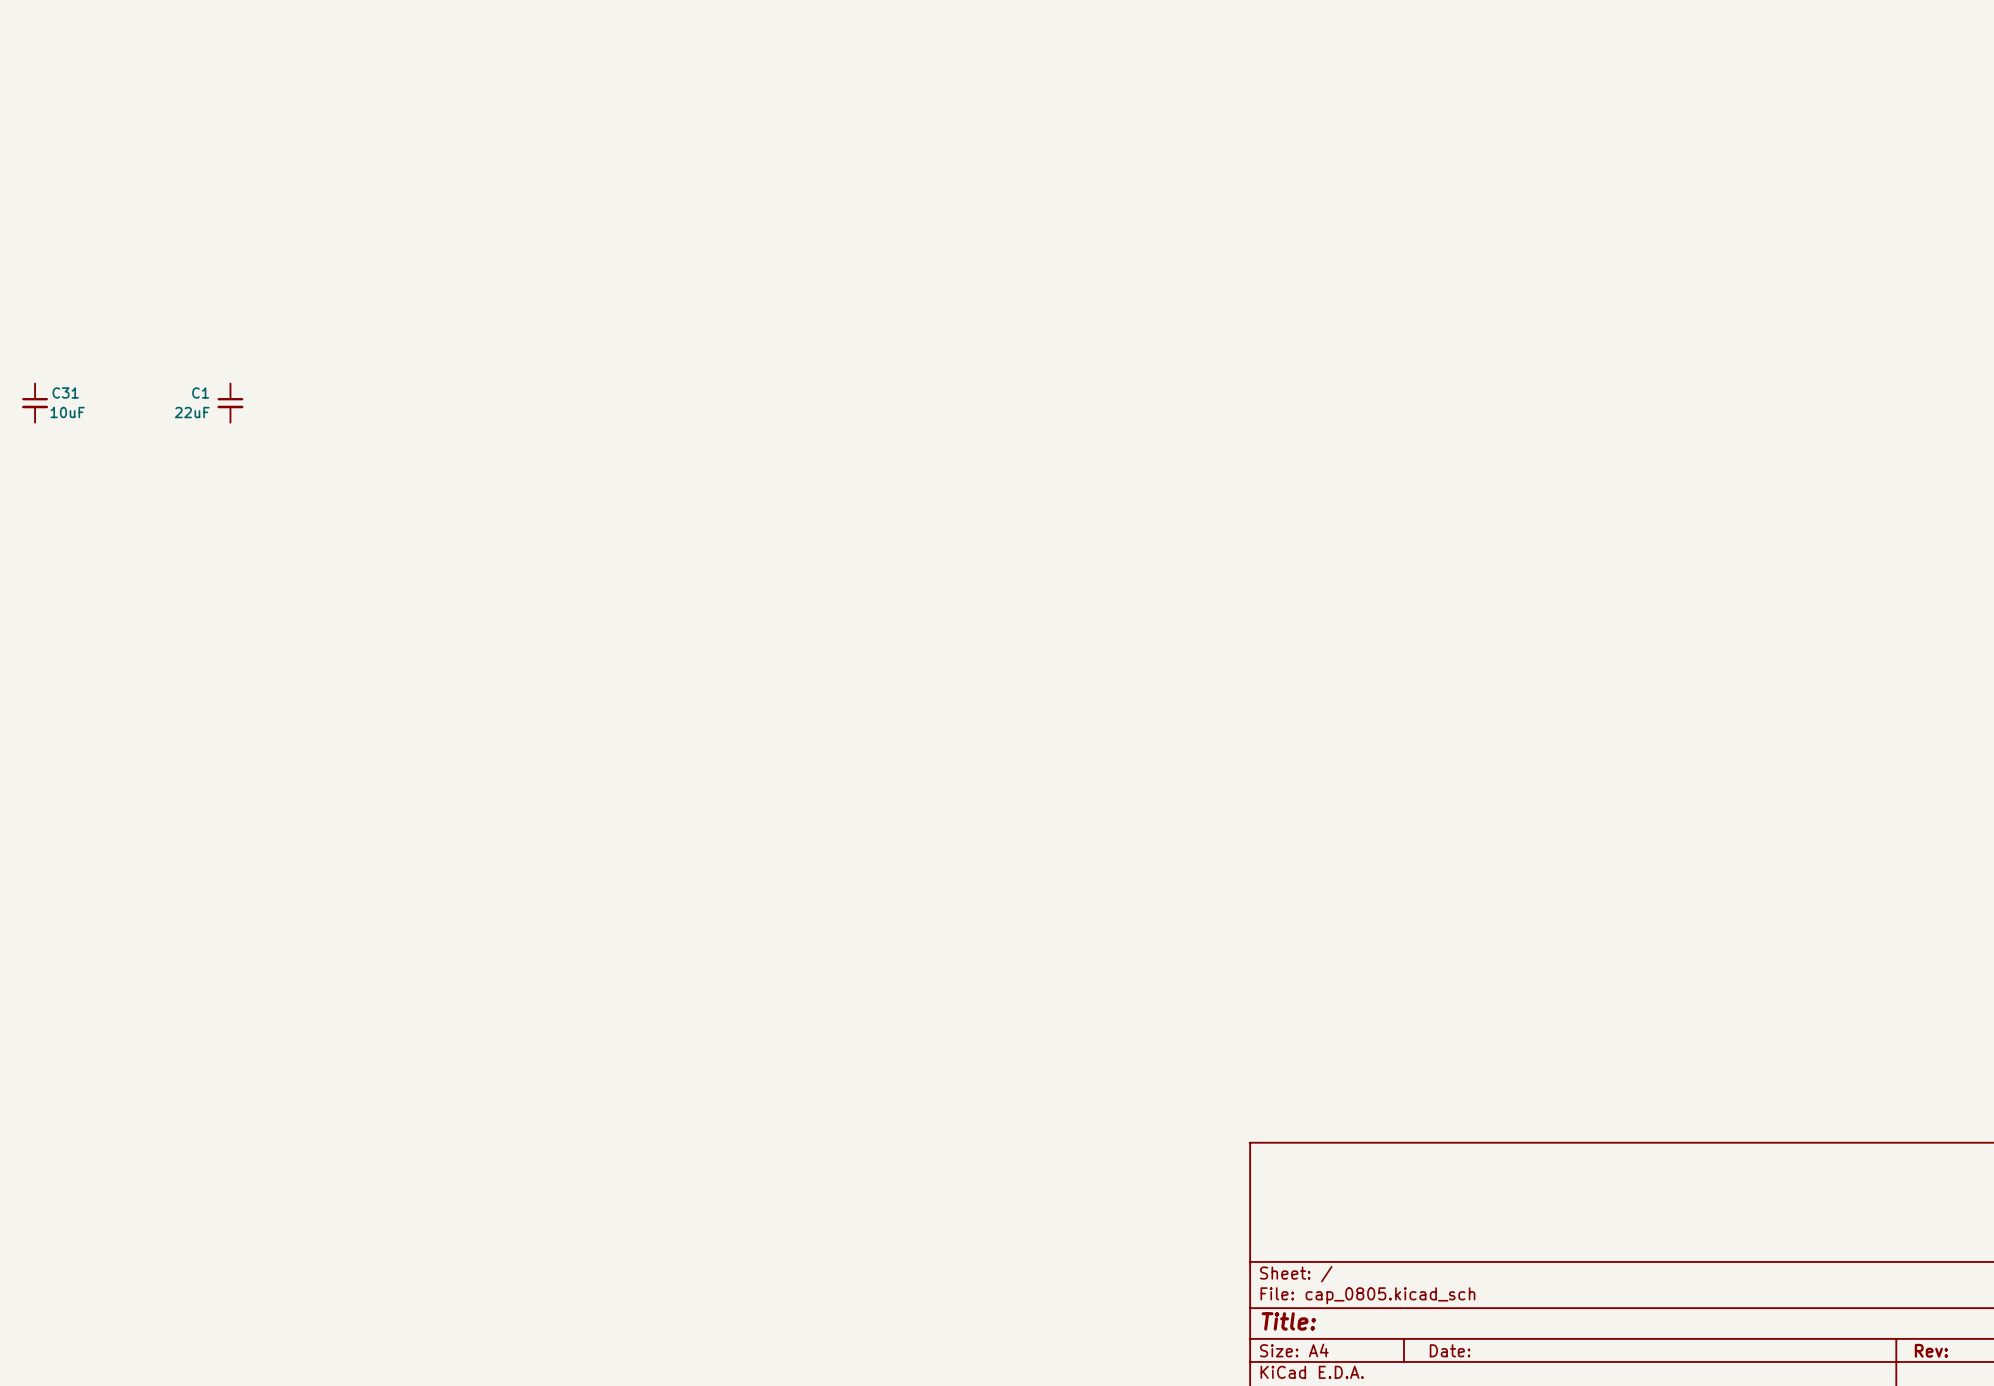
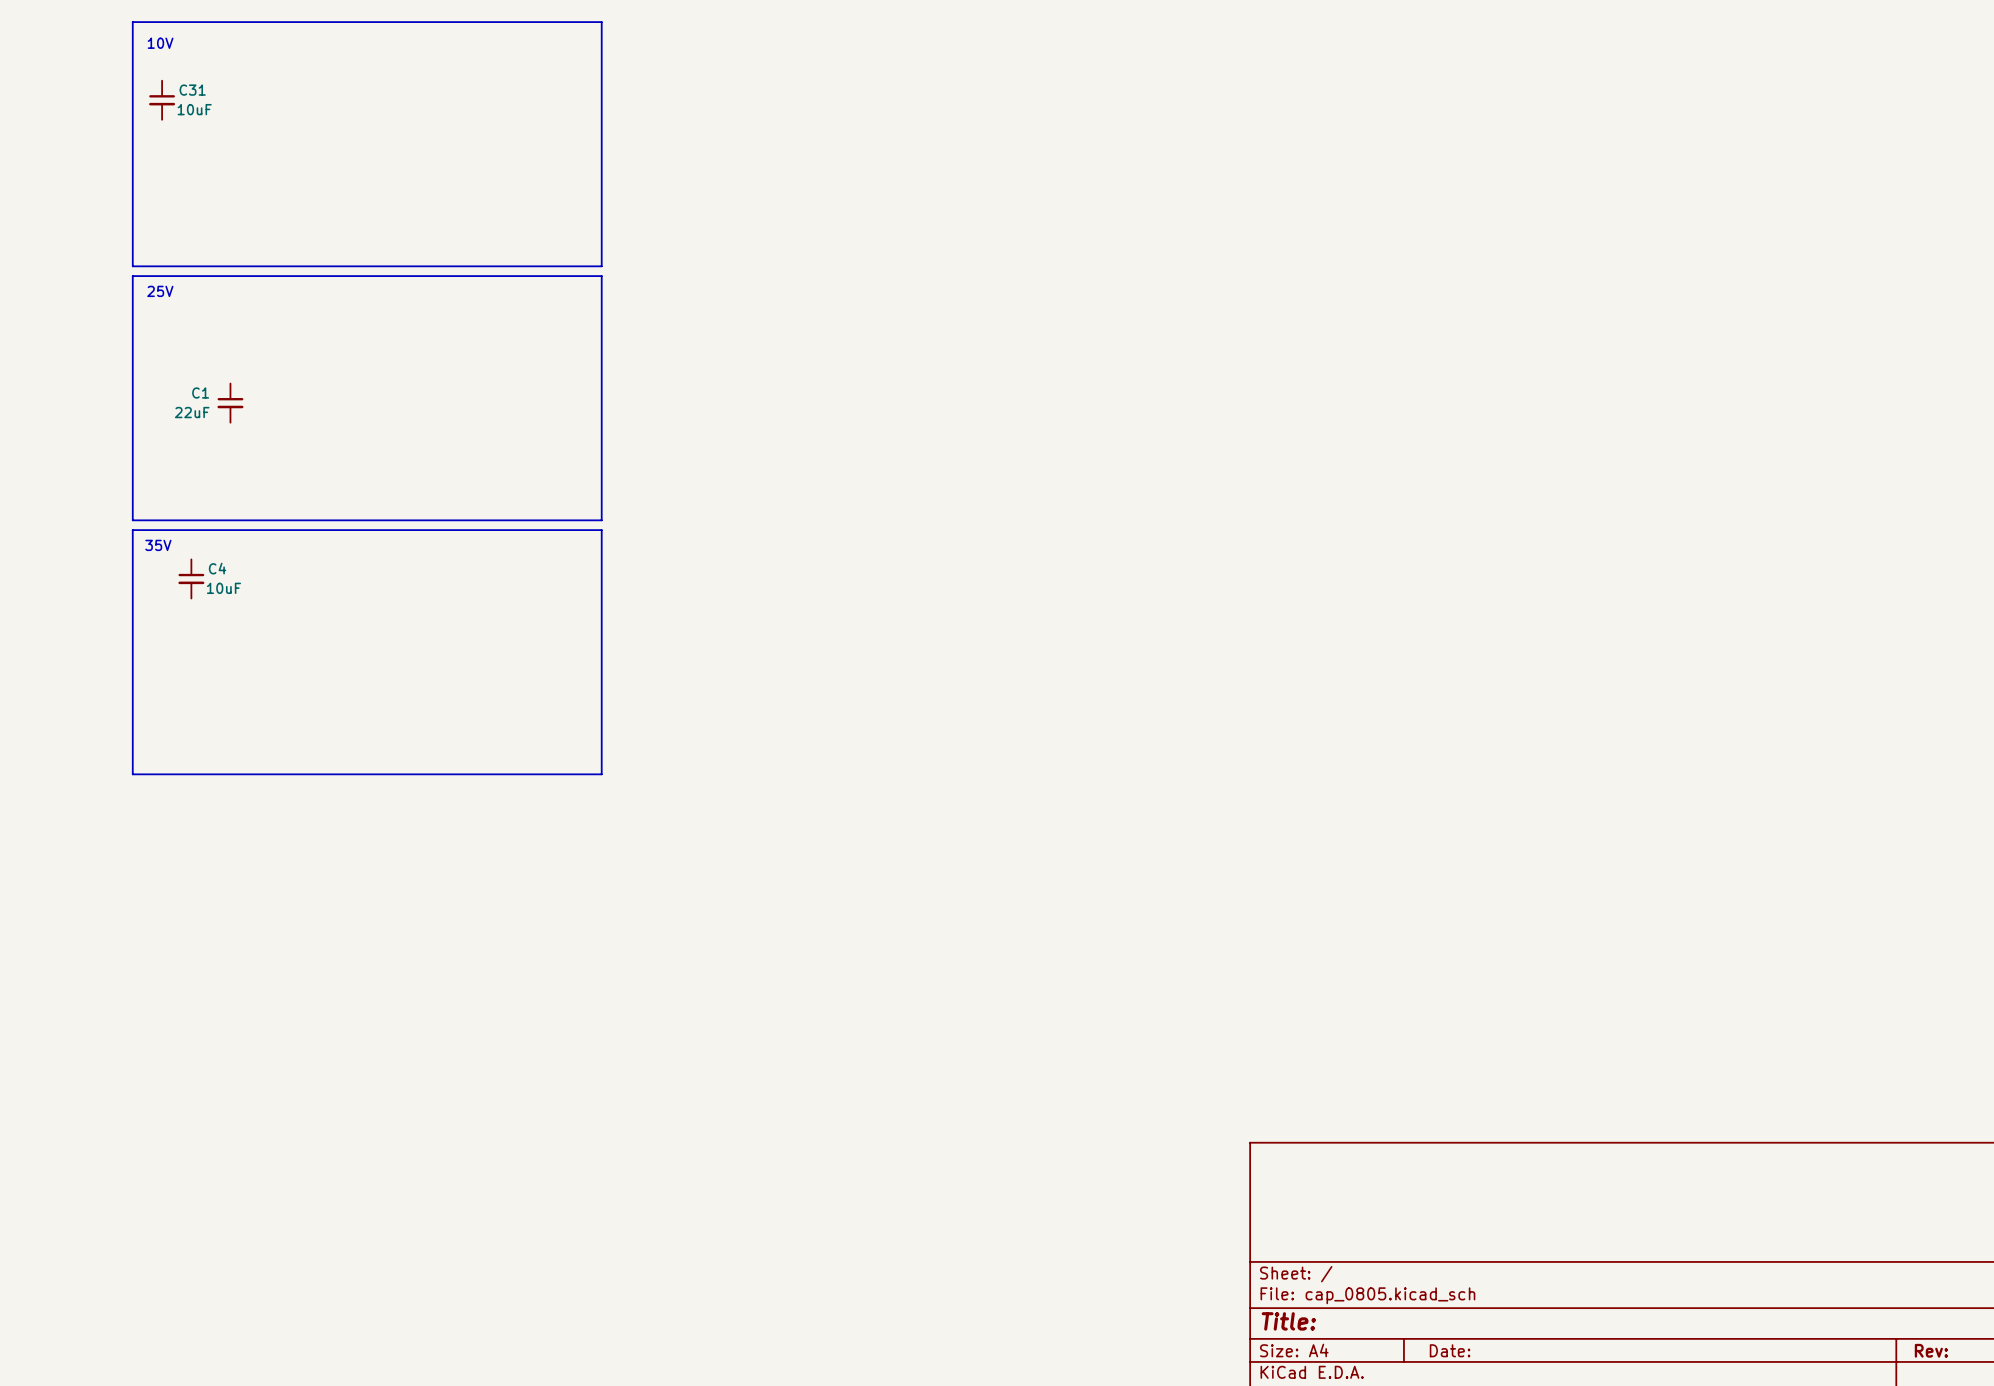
line: none -> (132, 22) (601, 22) (601, 266) (132, 266) (132, 22)
text: none -> 10V (160, 43)
line: none -> (132, 276) (132, 520) (601, 520) (601, 276) (132, 276)
text: none -> 25V (160, 291)
C31 position: (35, 403) -> (162, 100)
line: none -> (132, 530) (132, 774) (601, 774) (601, 530) (132, 530)
text: none -> 35V (158, 545)
C4: none -> 10uF (191, 578)

